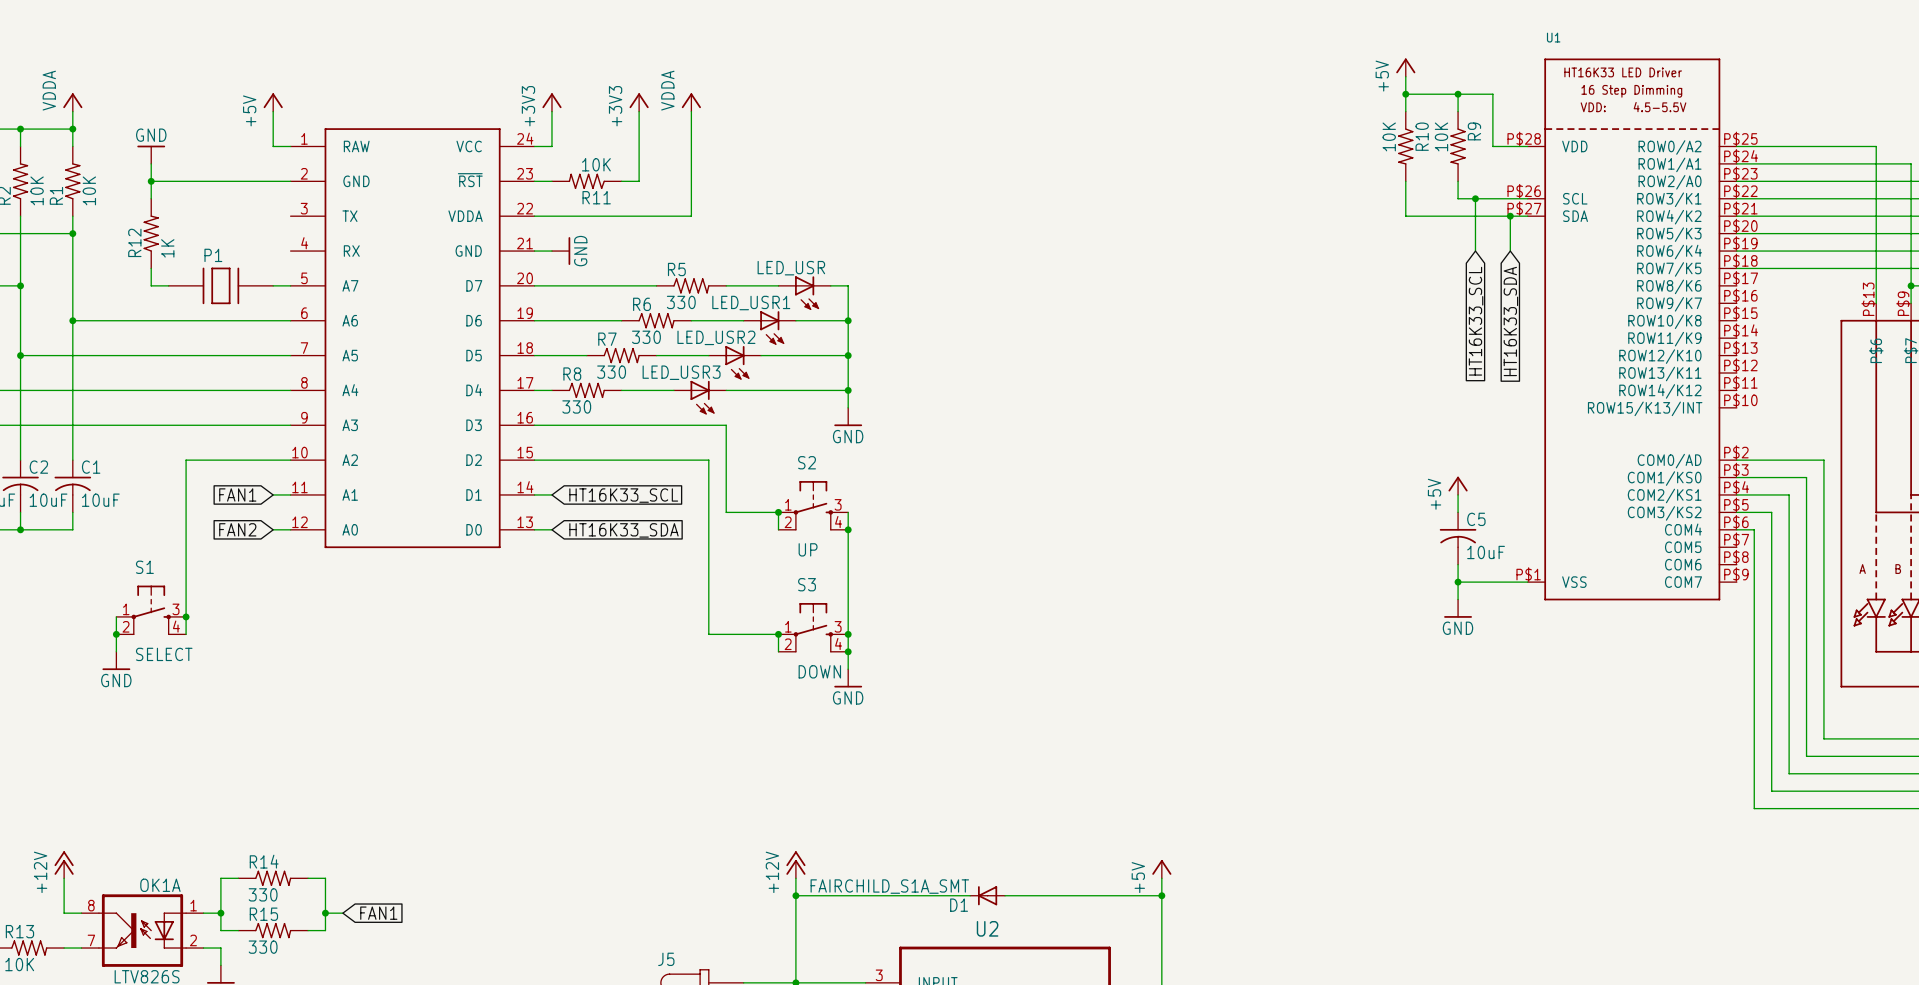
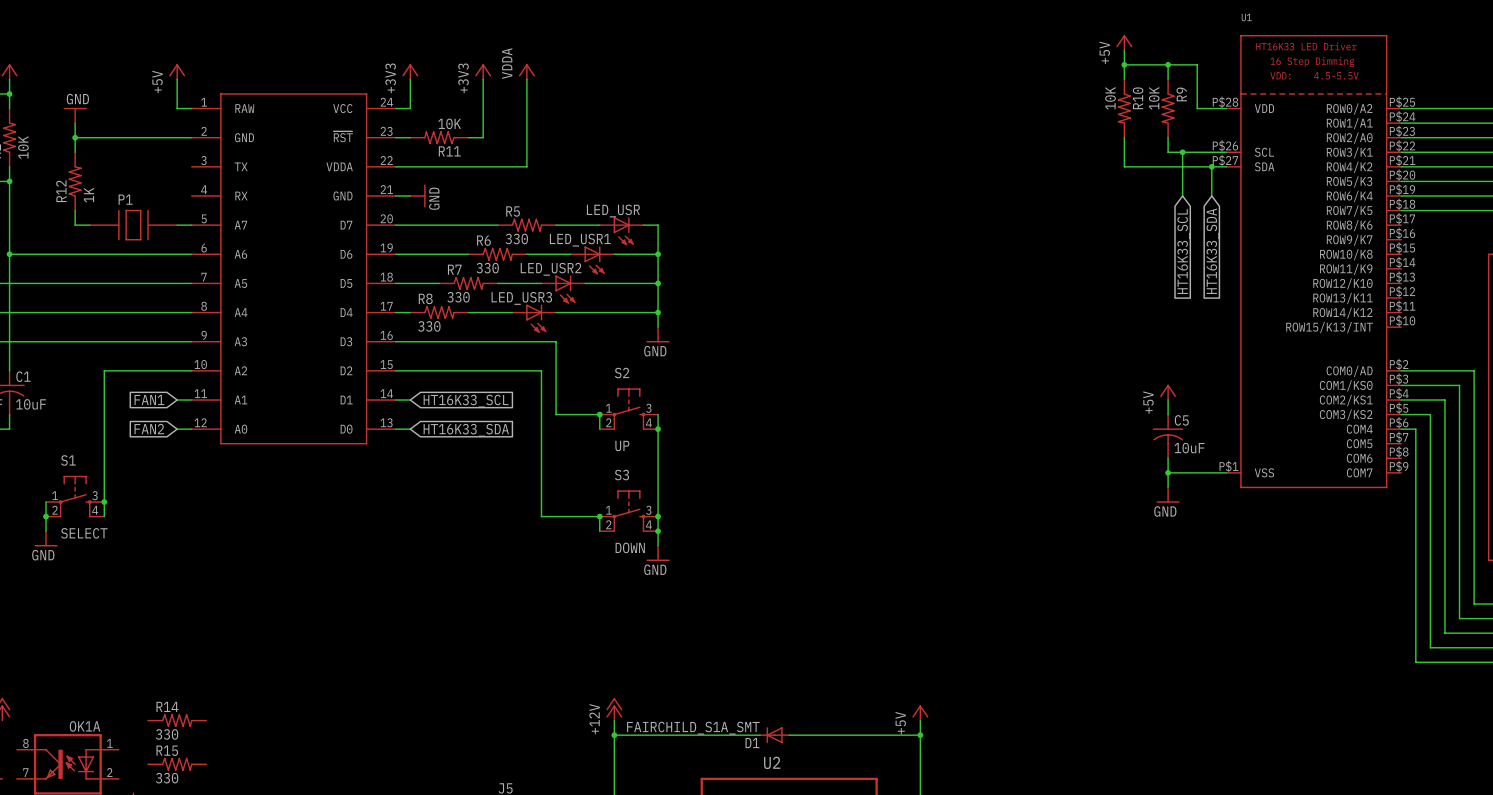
wire: (64, 878) (64, 913) (81, 913) -> none
wire: (238, 878) (220, 878) (220, 930) (238, 930) -> none
wire: (308, 878) (325, 878) (325, 930) (308, 930) -> none
wire: (203, 913) (220, 913) -> none
junction: (220, 913) -> none
wire: (325, 913) (342, 913) -> none
junction: (325, 913) -> none
global label: FAN1 (378, 913) -> none
wire: (64, 948) (81, 948) -> none
wire: (203, 948) (220, 948) (220, 965) -> none

